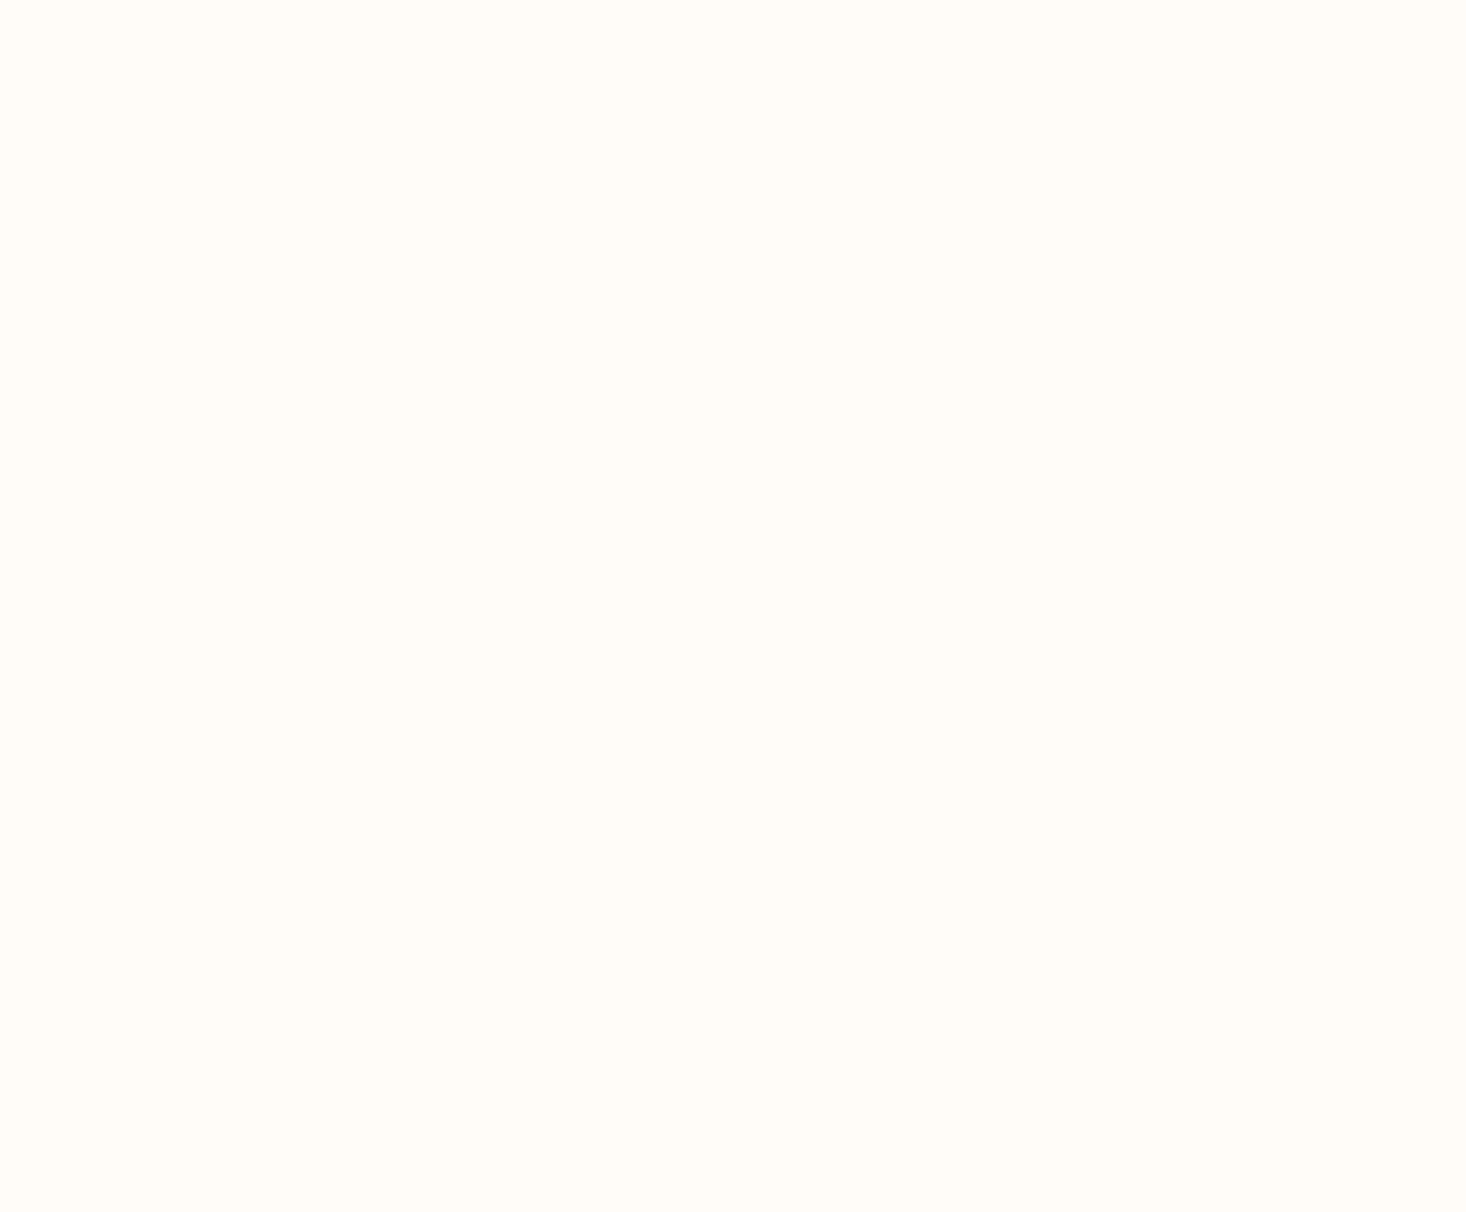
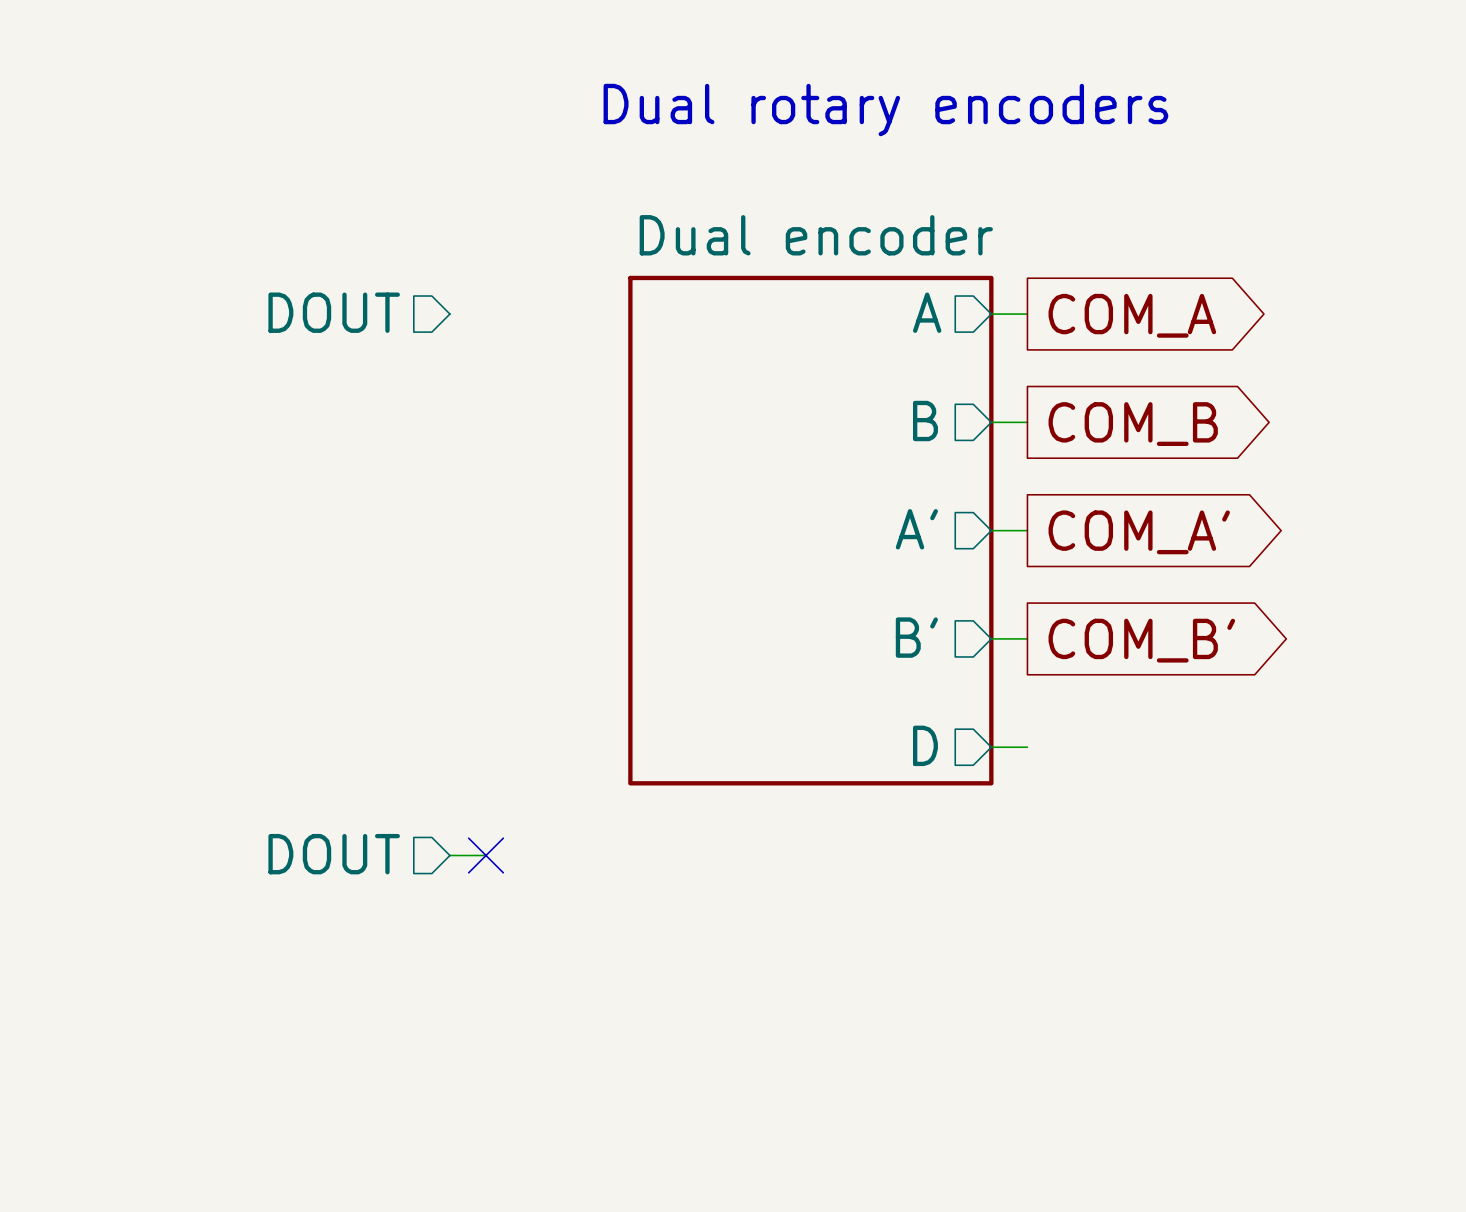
text: none -> Dual rotary encoders (885, 110)
sheet pin: none -> DOUT (334, 312)
sheet pin: none -> A (927, 312)
wire: none -> (991, 314) (1027, 314)
global label: none -> COM_A (1132, 315)
sheet pin: none -> B (925, 421)
wire: none -> (991, 422) (1027, 422)
global label: none -> COM_B (1133, 424)
sheet pin: none -> A' (916, 529)
sheet Dual encoder: none -> (810, 530)
wire: none -> (991, 530) (1027, 530)
global label: none -> COM_A' (1139, 532)
sheet pin: none -> B' (916, 637)
wire: none -> (991, 638) (1027, 638)
global label: none -> COM_B' (1141, 640)
sheet pin: none -> D (925, 745)
wire: none -> (991, 747) (1027, 747)
sheet pin: none -> DOUT (334, 854)
wire: none -> (449, 855) (486, 855)
no-connect mark: none -> (486, 855)

